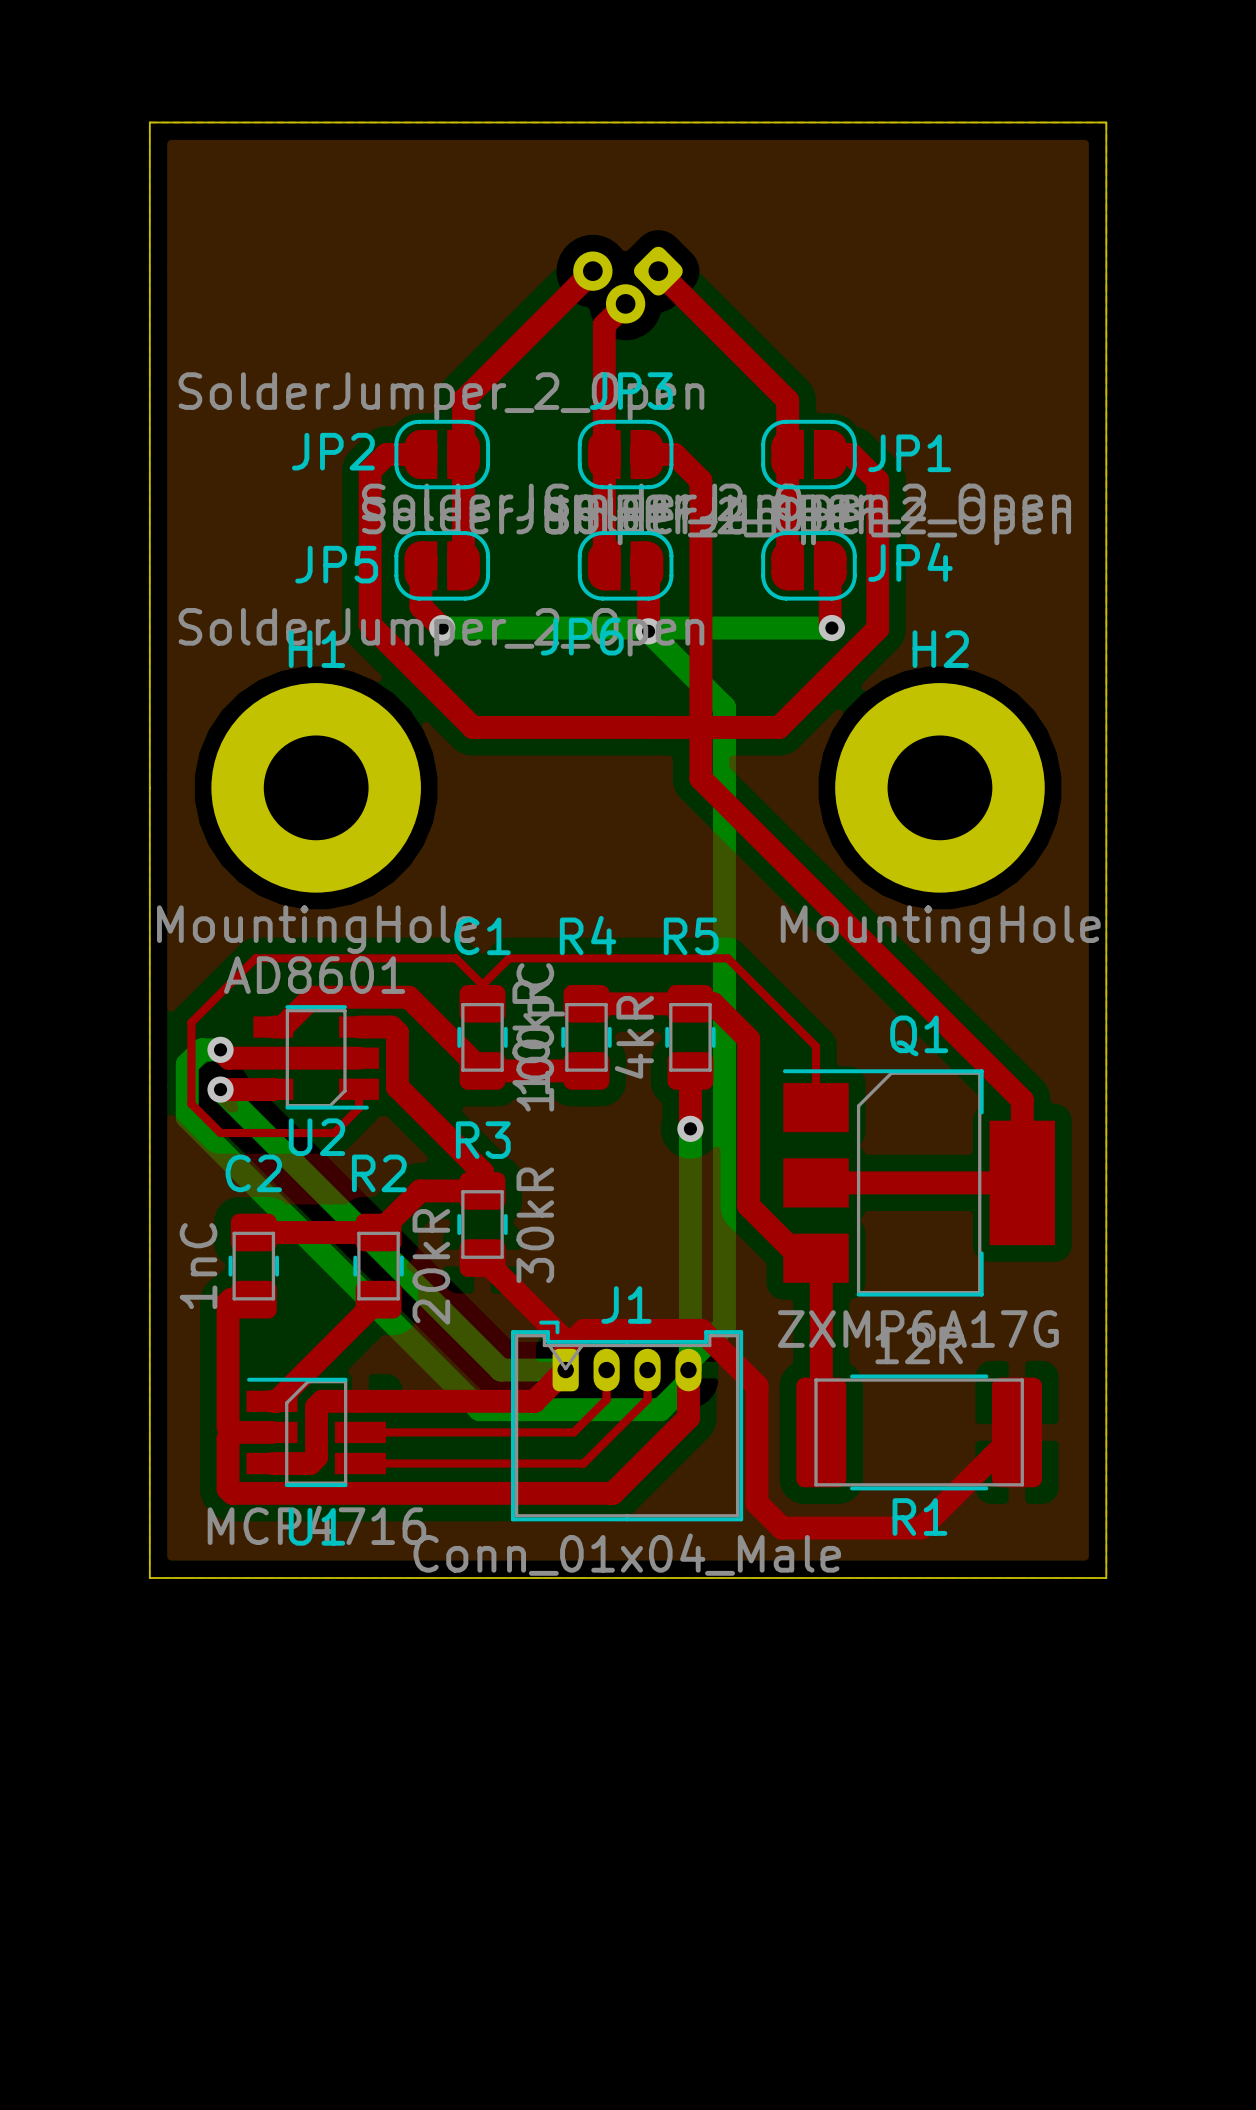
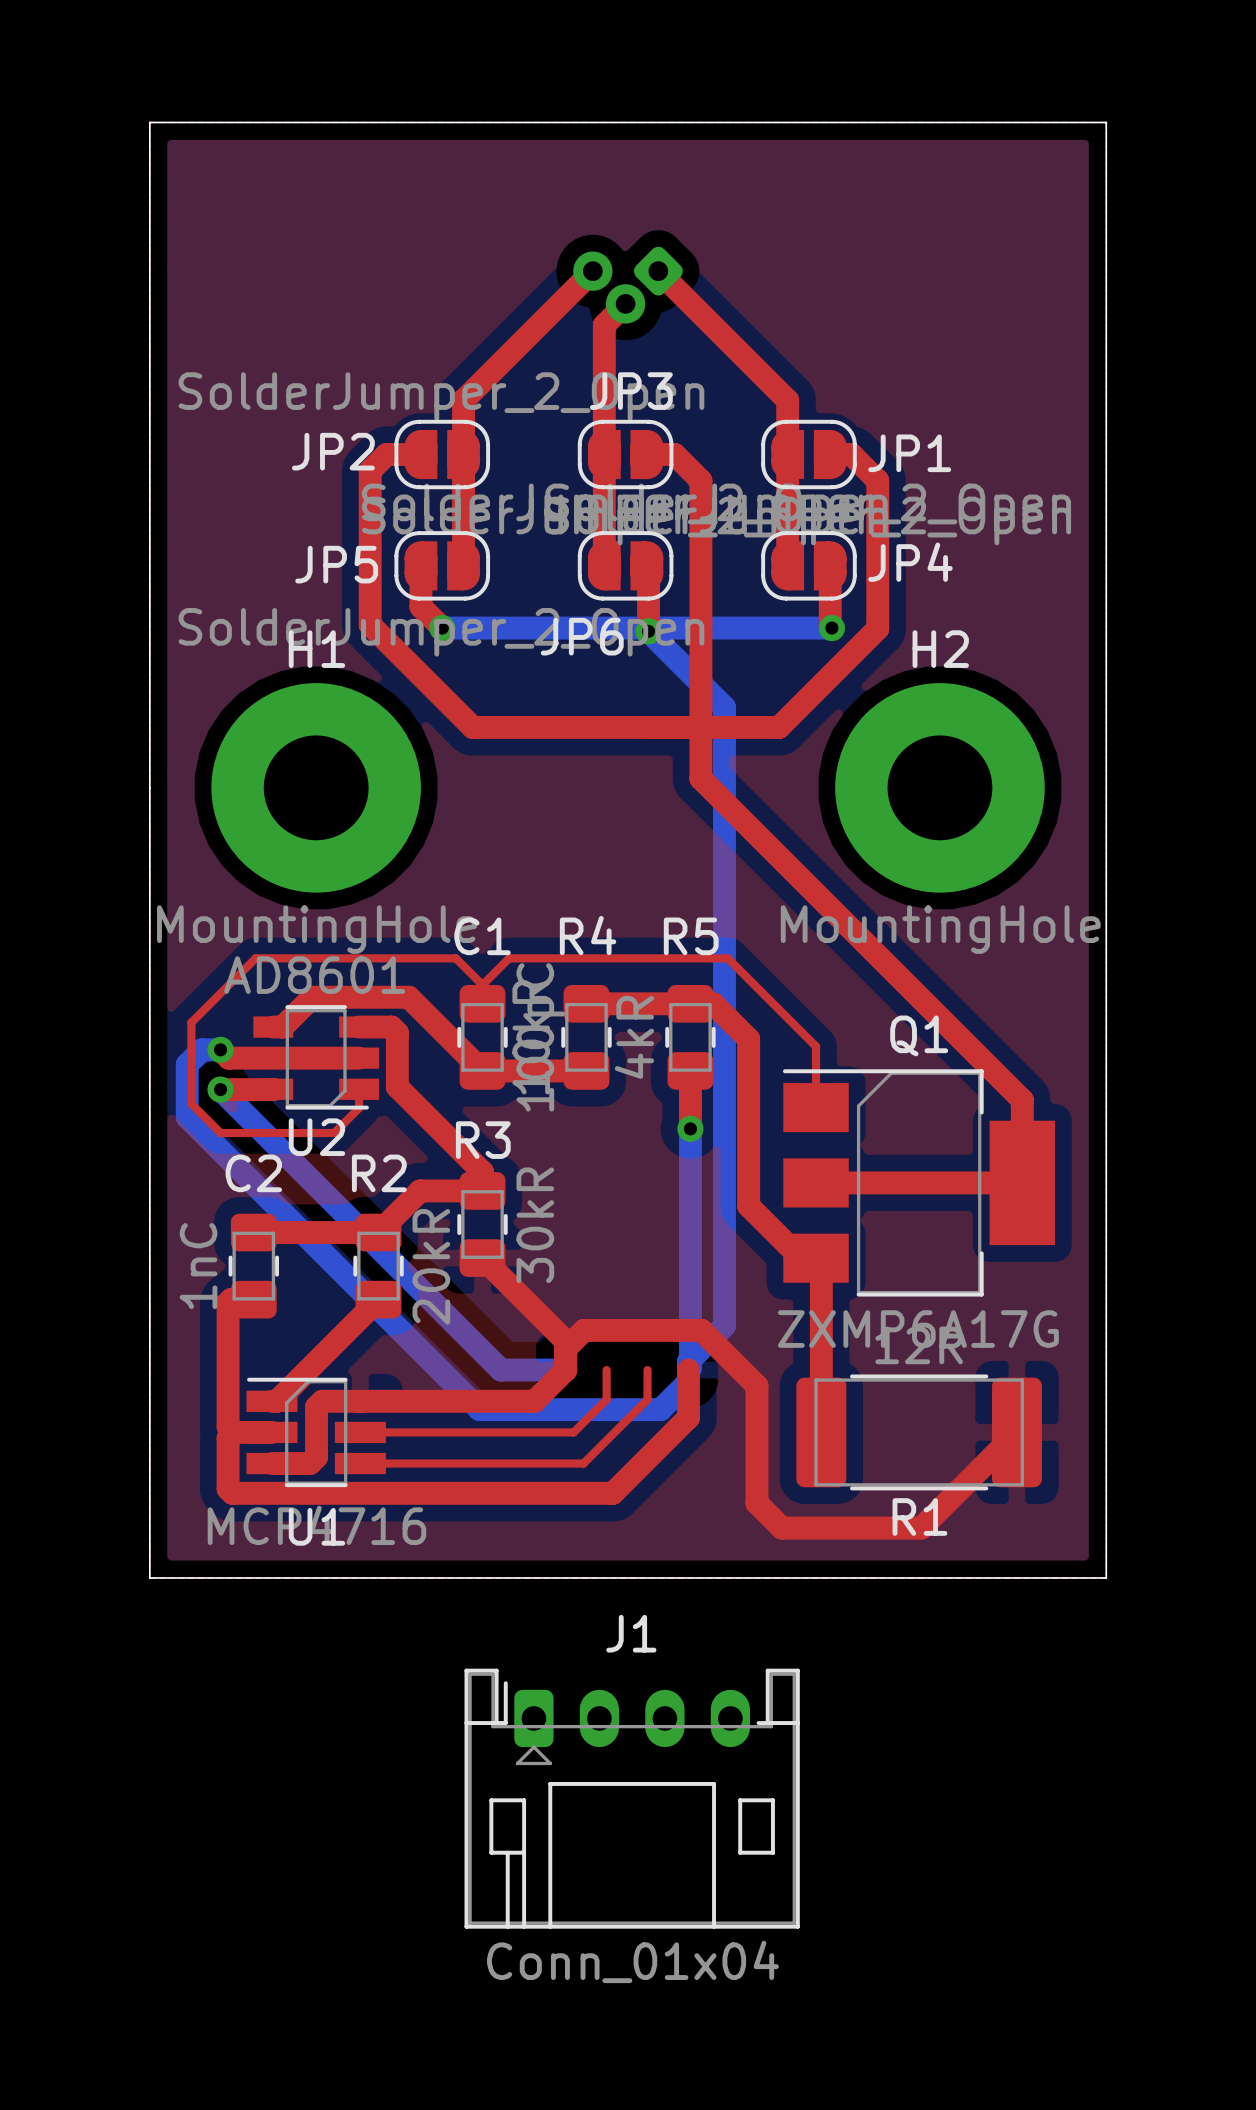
J1 footprint: [511, 1320, 744, 1522] -> [464, 1668, 800, 1929]
J1 value: Conn_01x04_Male (627, 1554) -> Conn_01x04 (632, 1961)

